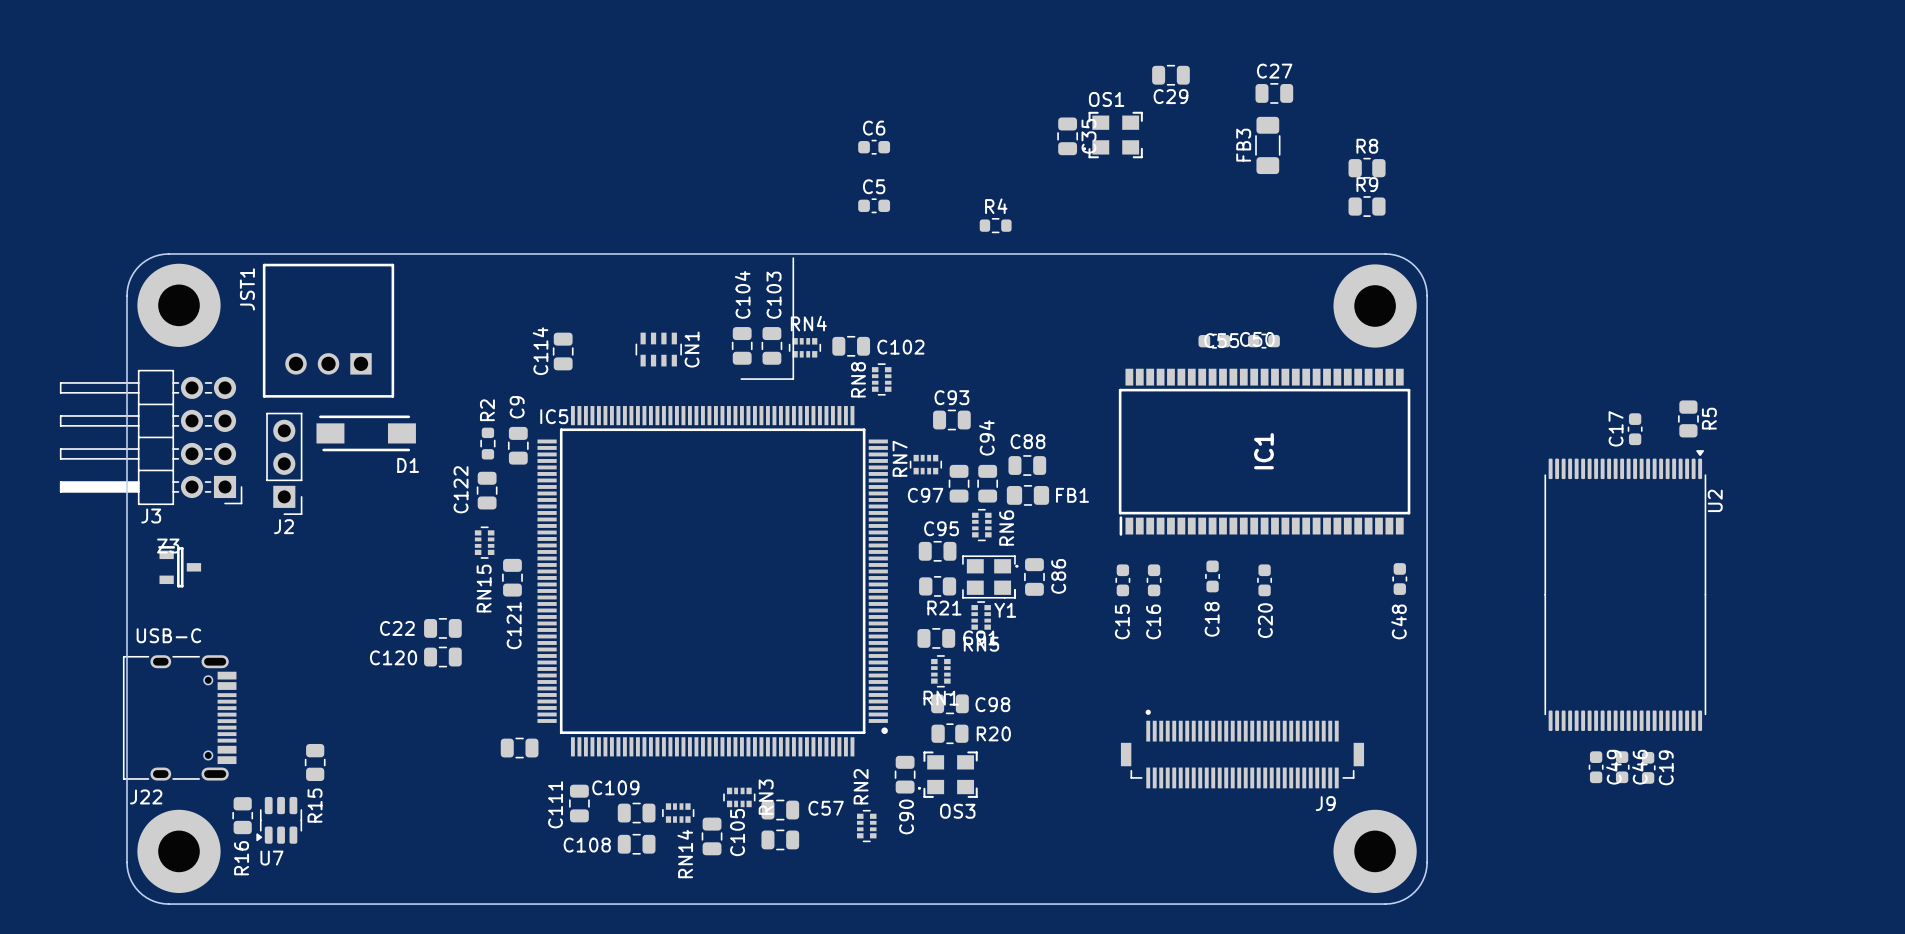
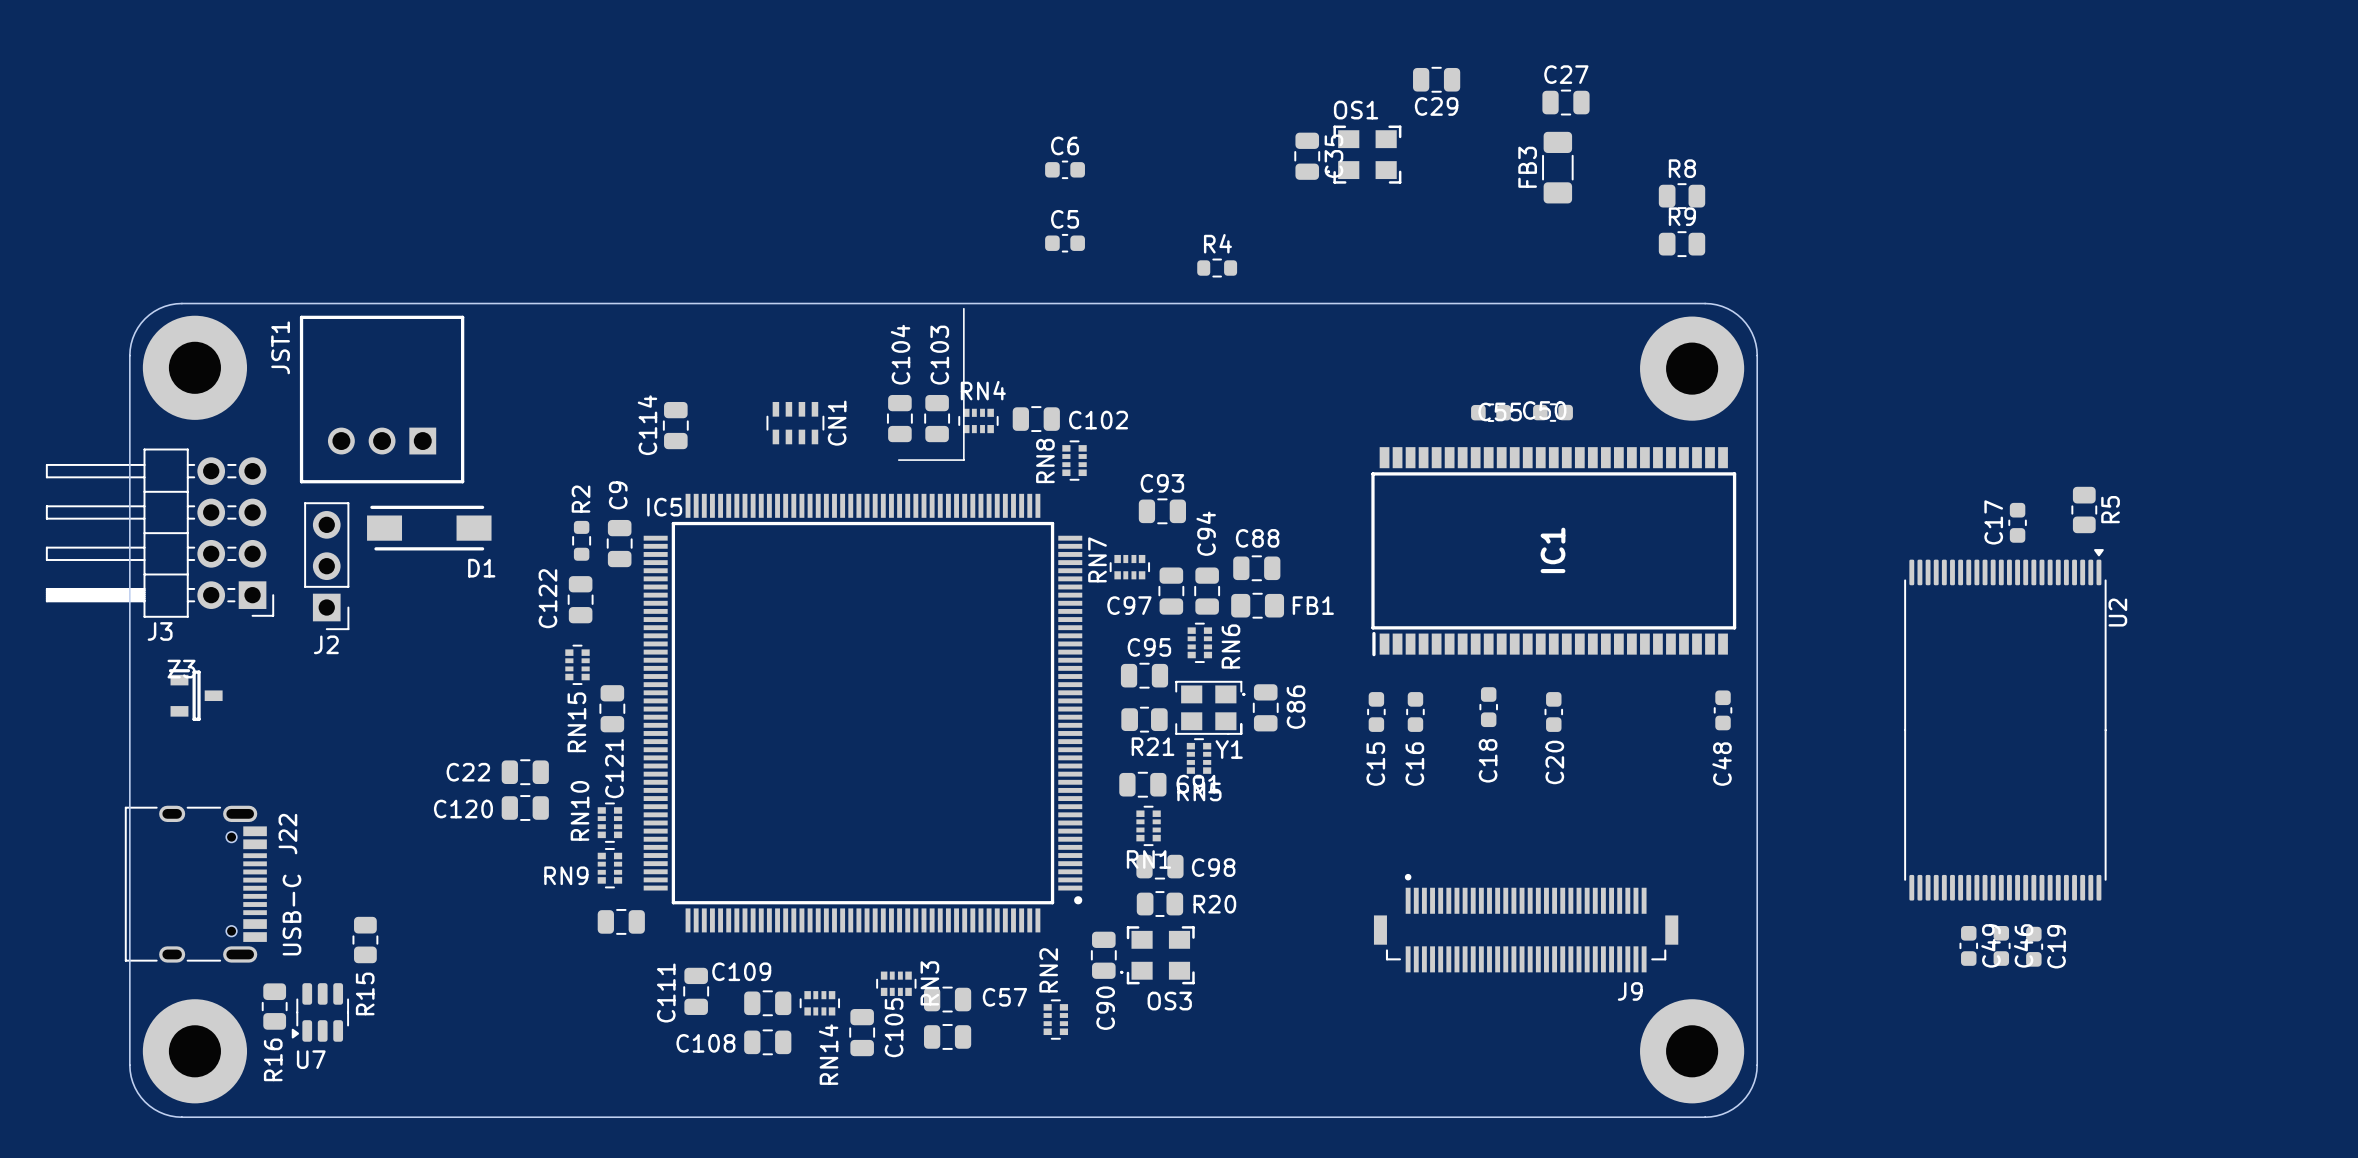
text rotation: 0° (168, 635) -> 90° counterclockwise (291, 915)
text position: USB-C (168, 635) -> USB-C (291, 915)
RN10: none -> (609, 822)
RN9: none -> (609, 868)
J22 name rotation: 0° (146, 796) -> 90° counterclockwise (287, 834)
J22 name position: J22 (146, 796) -> J22 (287, 834)

